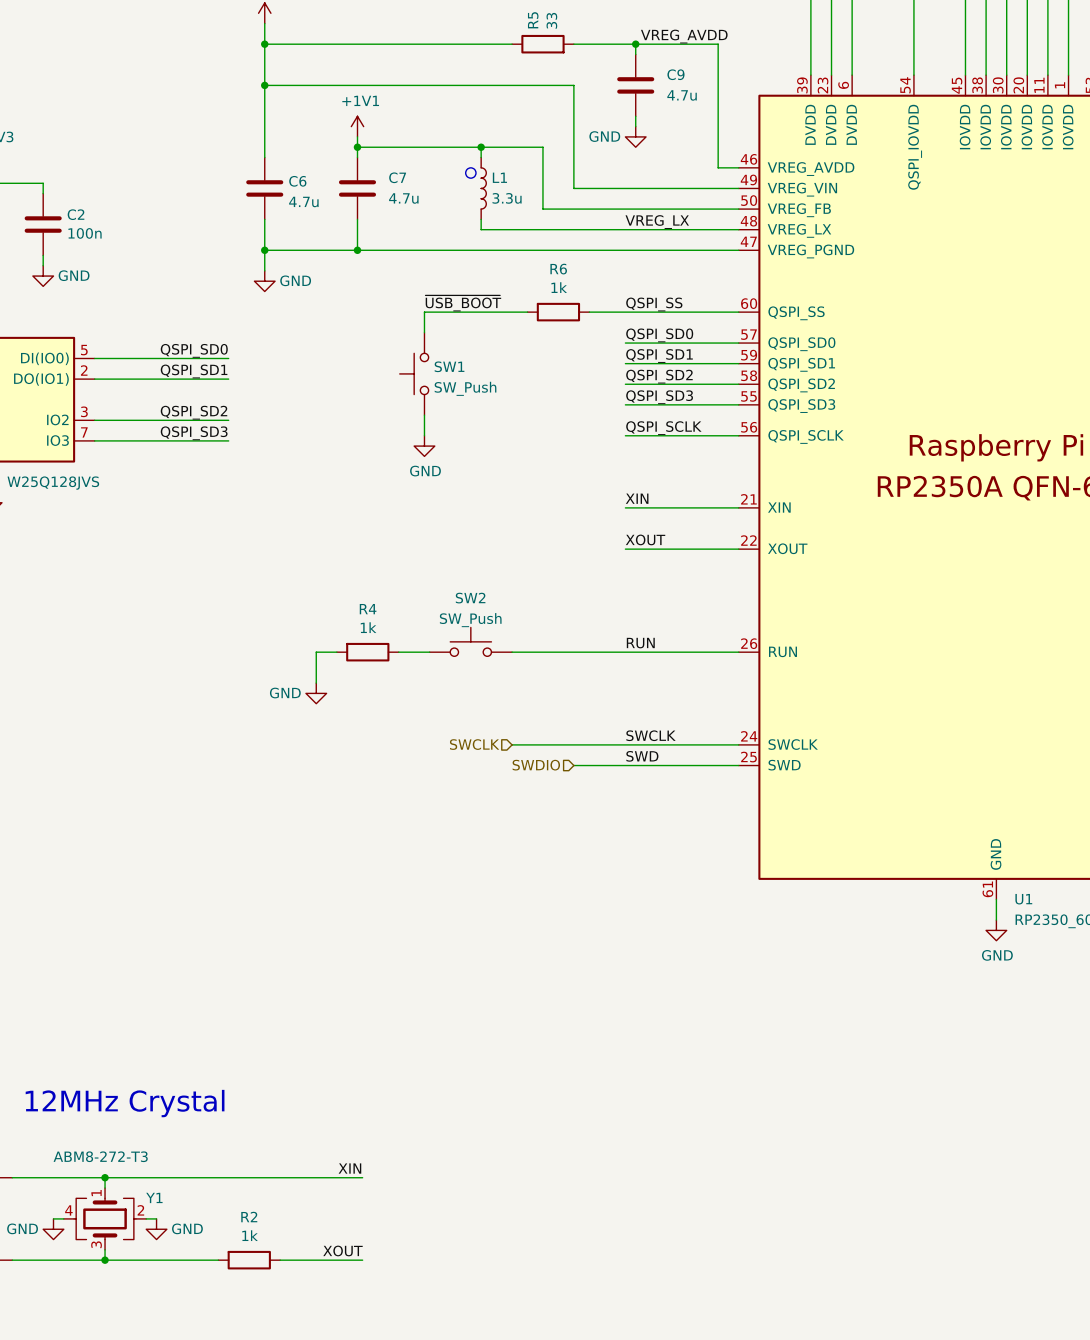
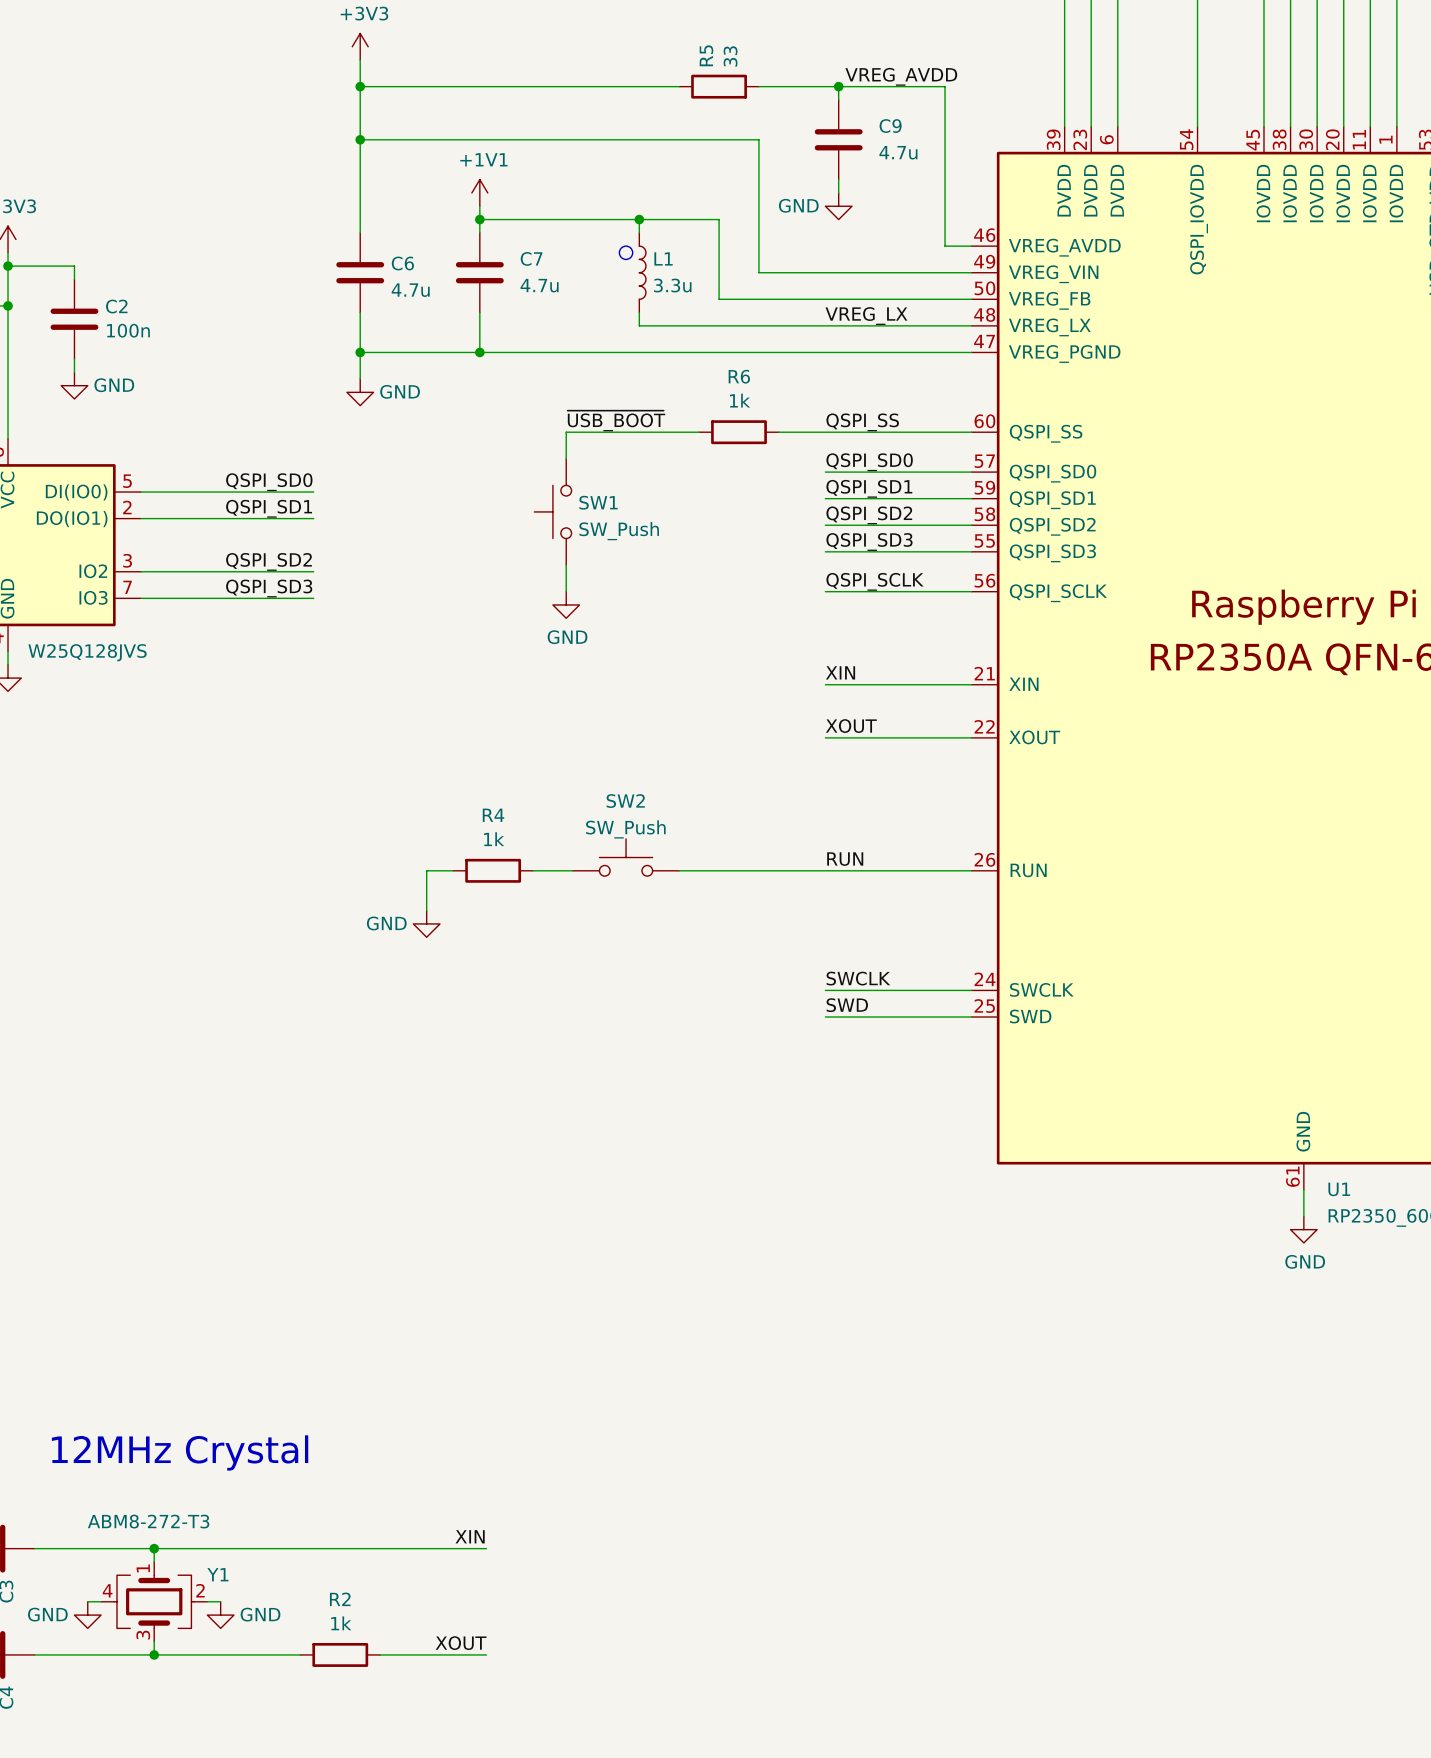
hierarchical label: SWCLK (474, 744) -> none
wire: (512, 744) (625, 744) -> none
hierarchical label: SWDIO (536, 765) -> none
wire: (573, 765) (625, 765) -> none

